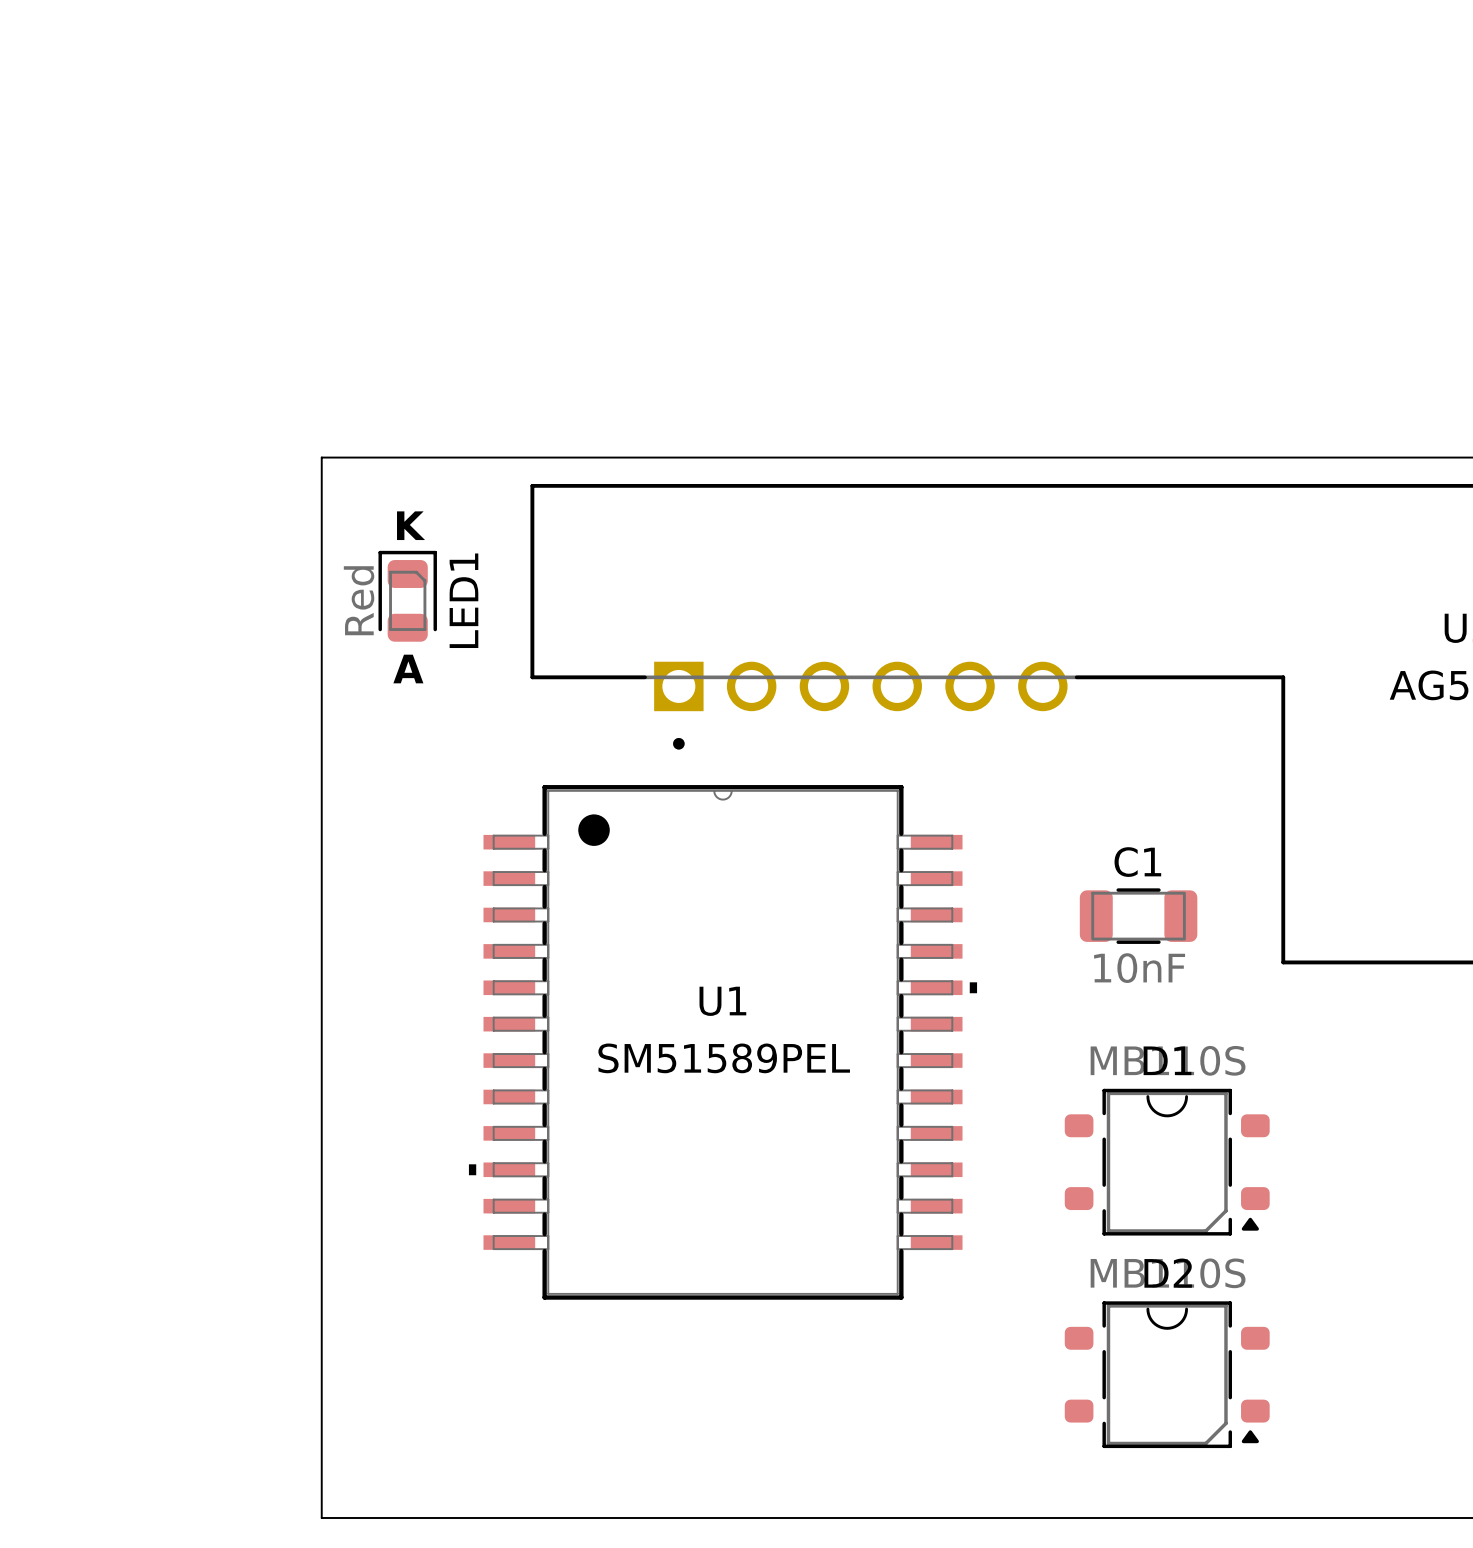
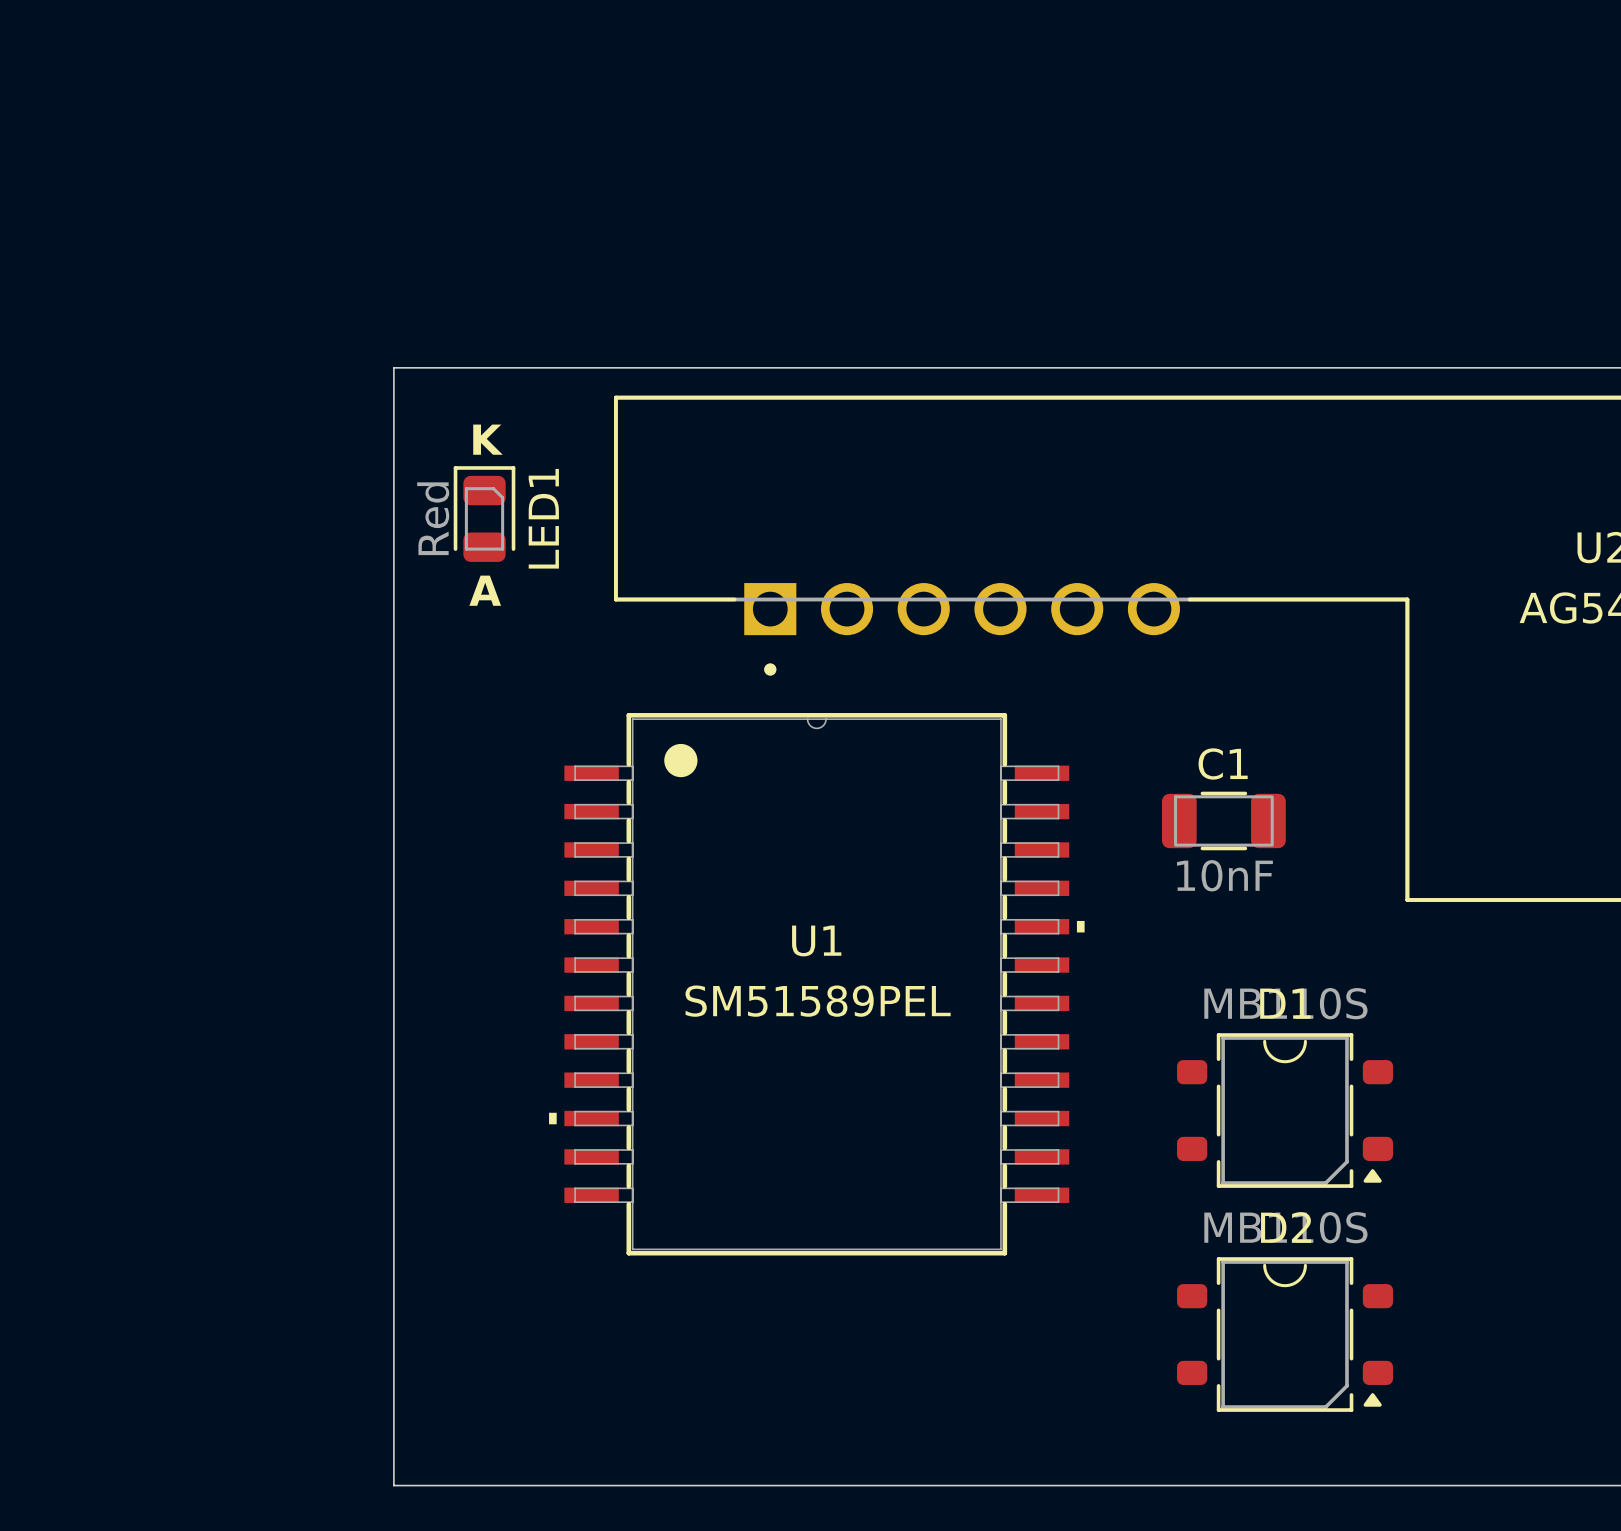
C1 position: (1138, 916) -> (1223, 820)

